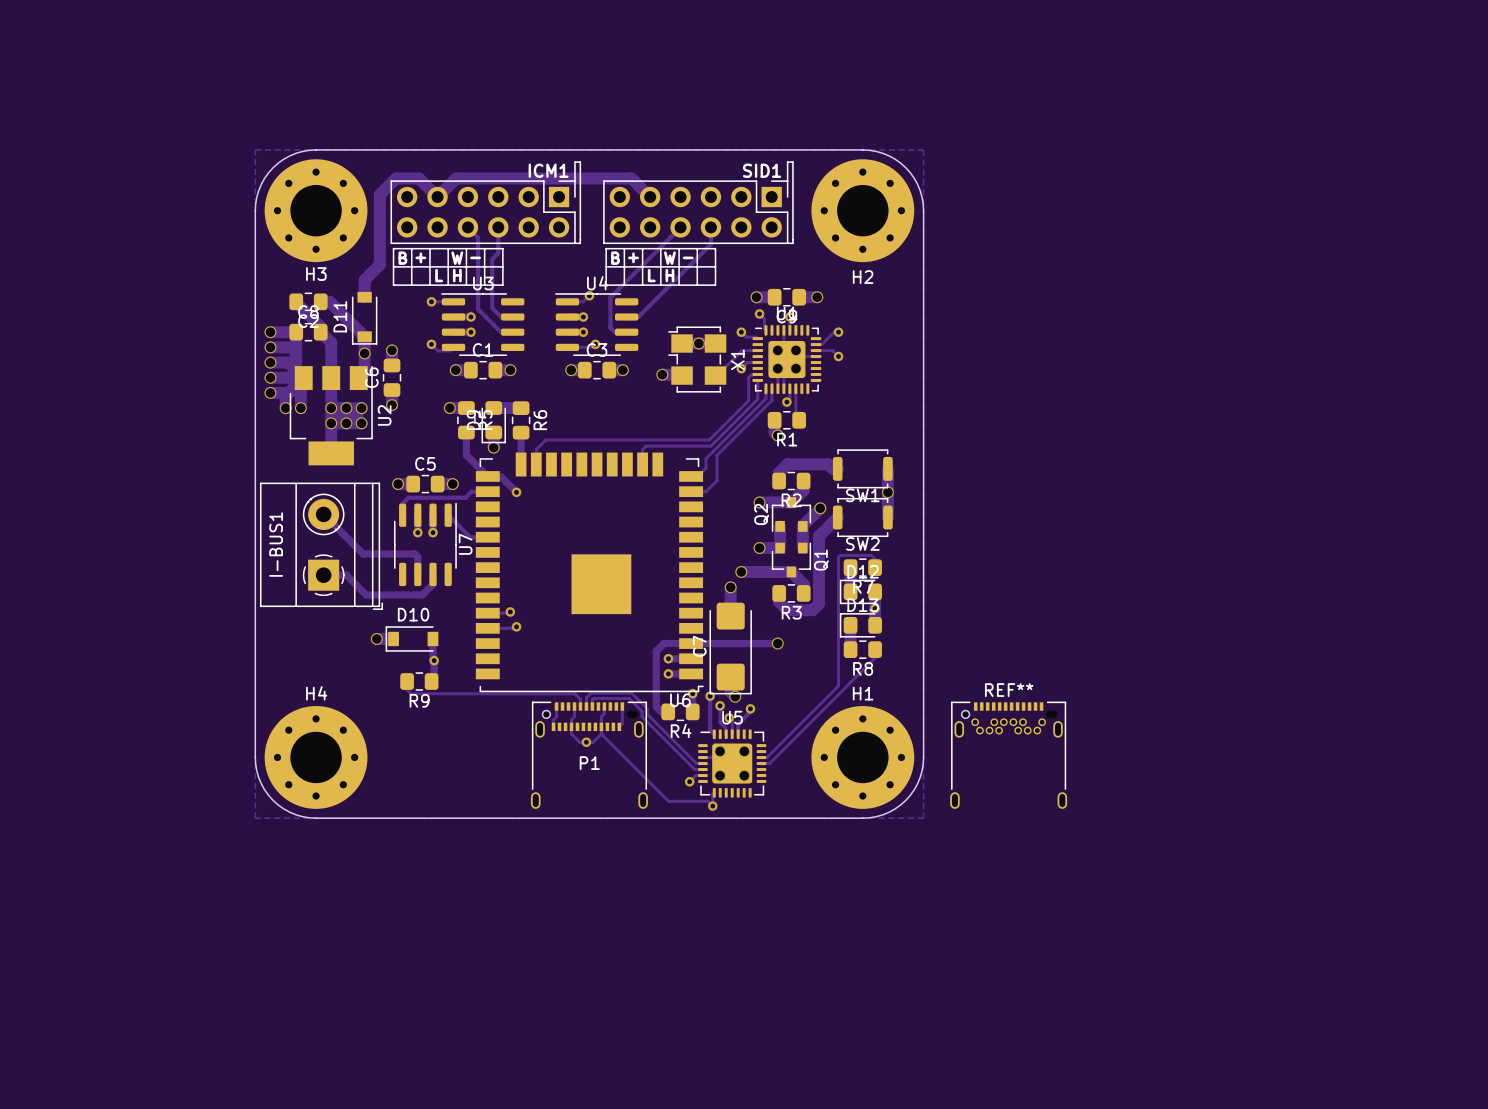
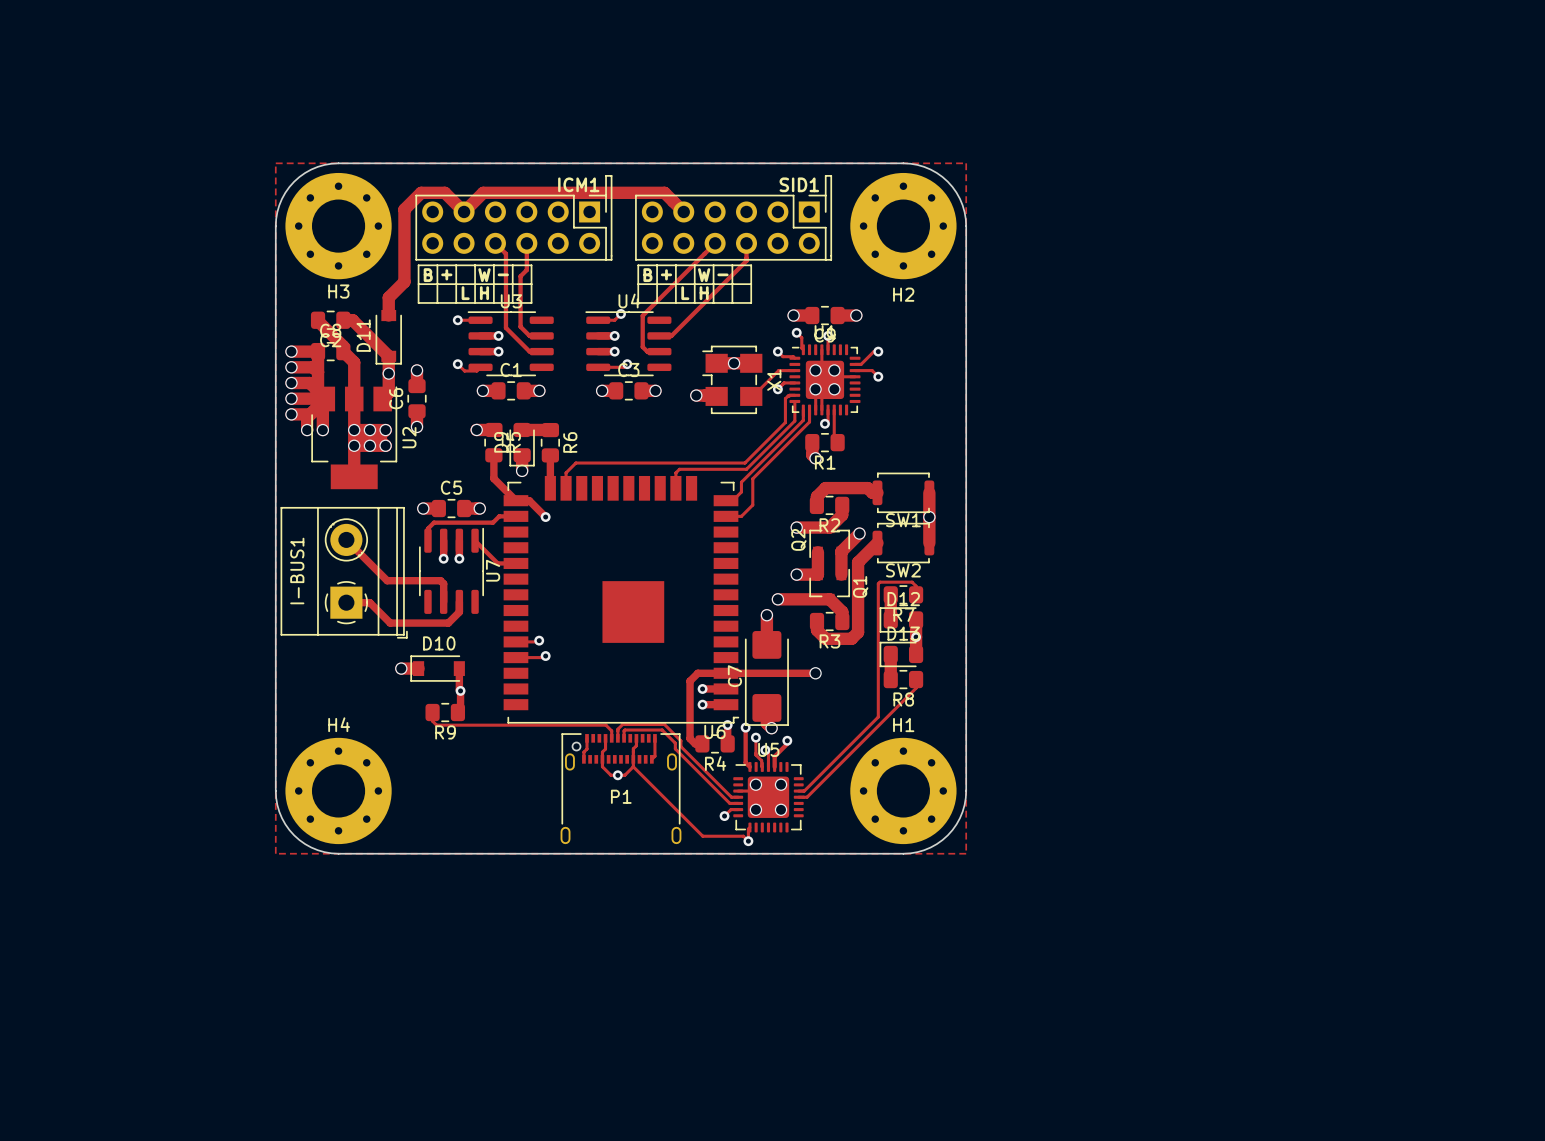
REF**: (1008, 755) -> none

